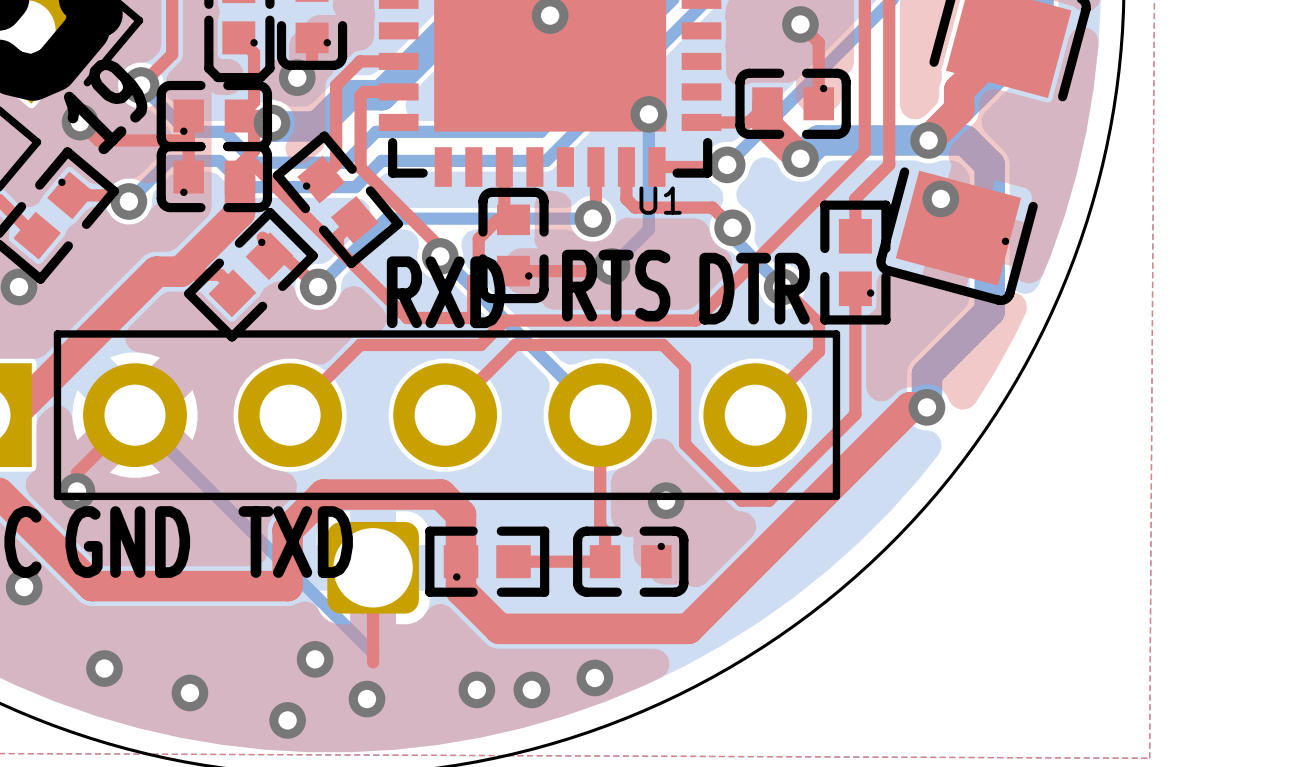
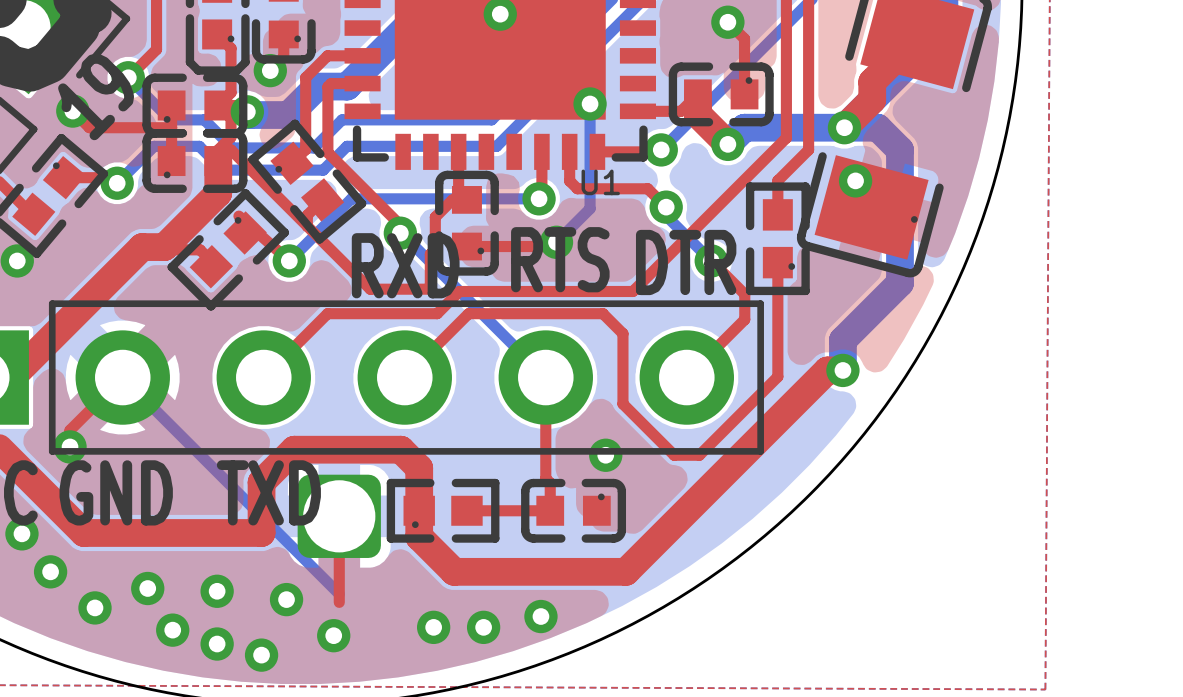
via: none -> (50, 571)
via: none -> (147, 588)
via: none -> (217, 591)
via: none -> (217, 644)

